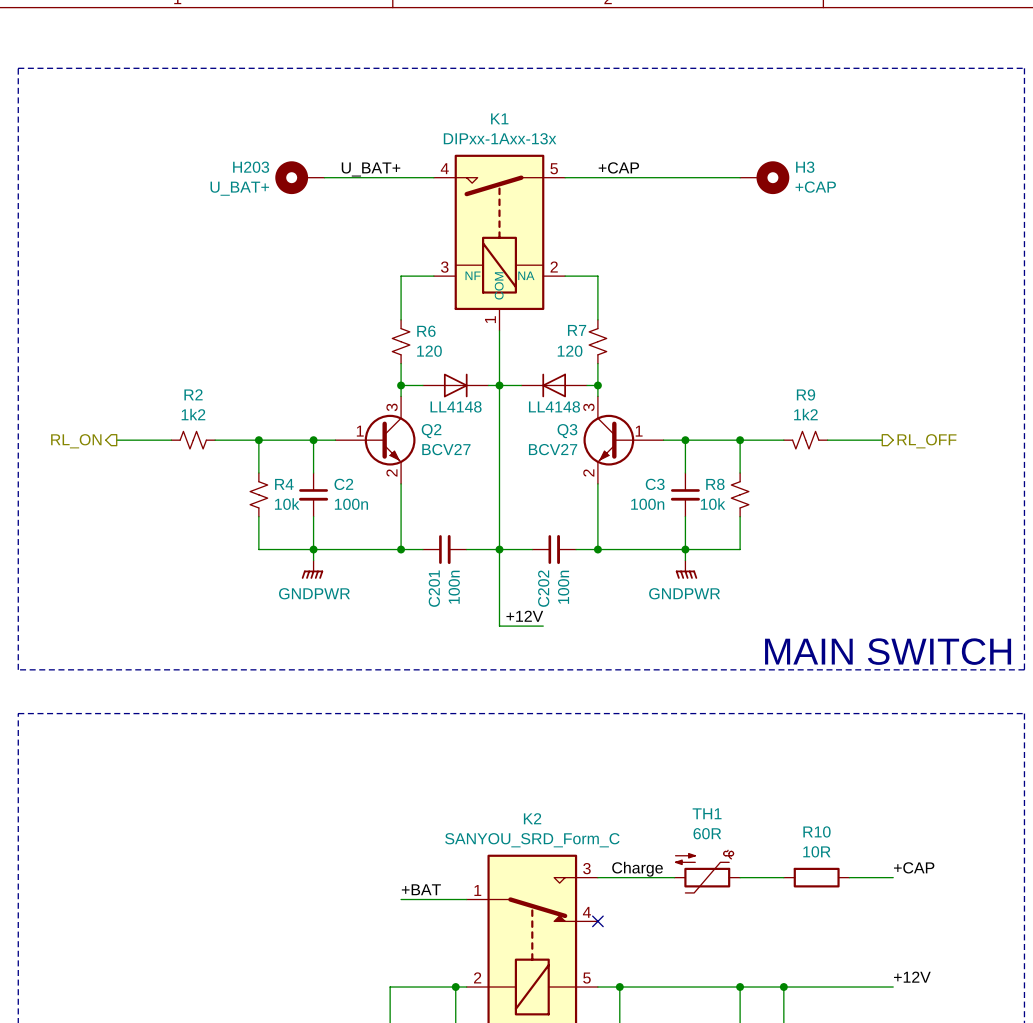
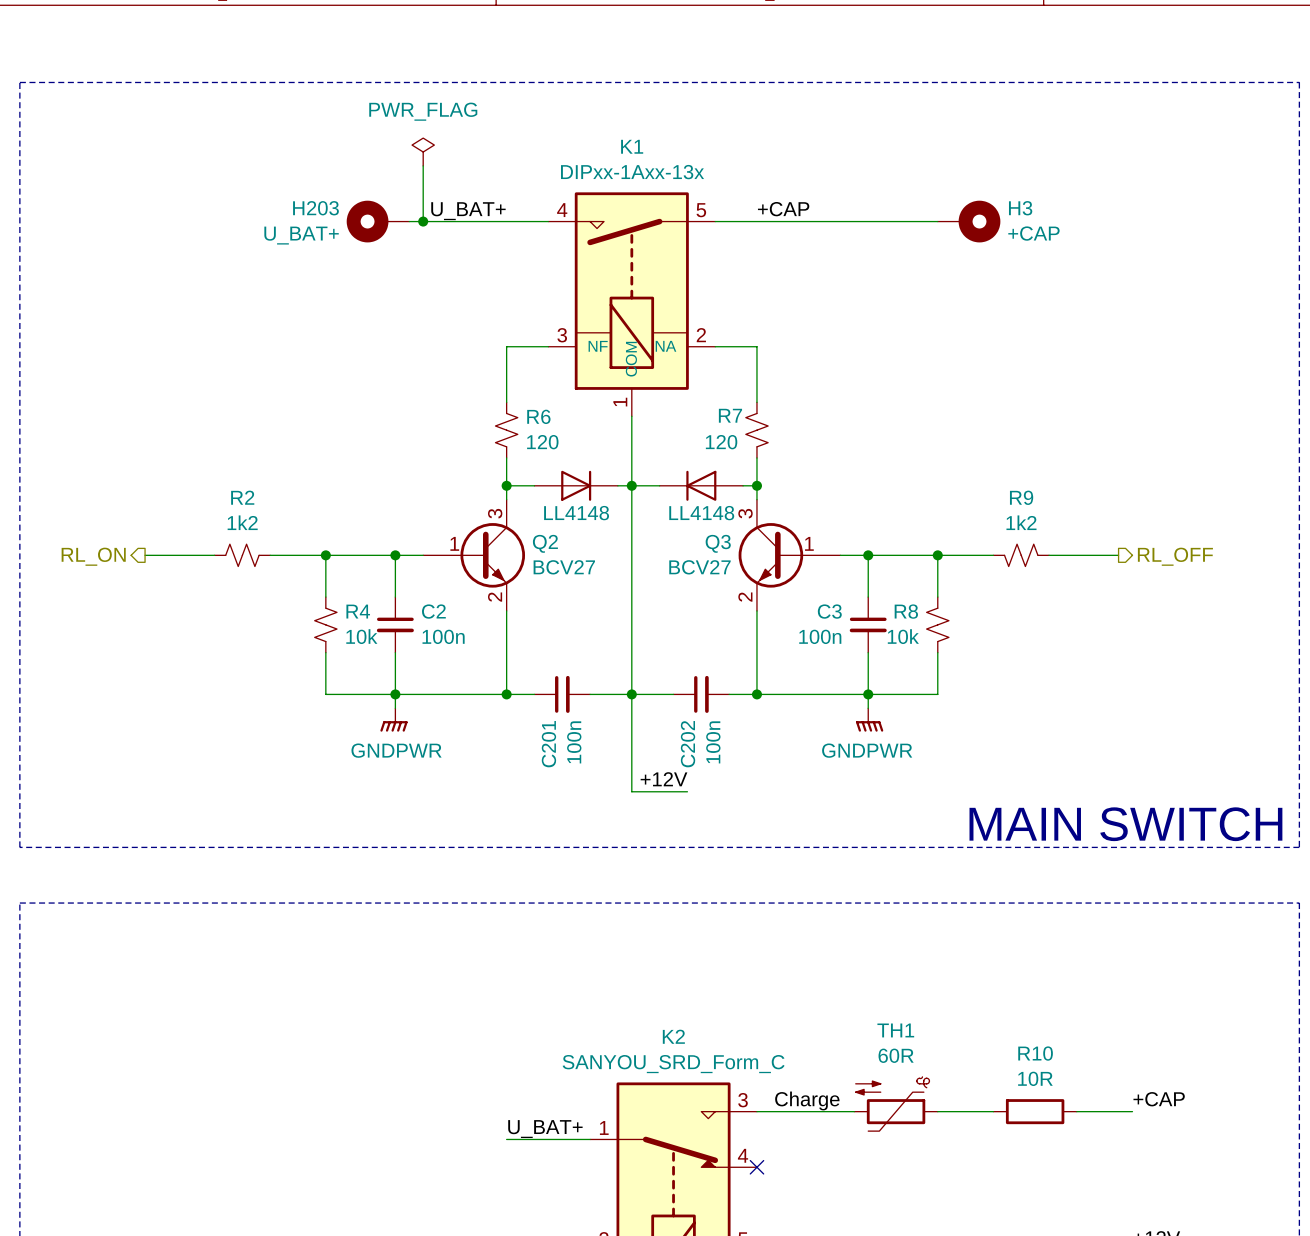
power symbol: none -> PWR_FLAG (423, 152)
wire: none -> (423, 165) (423, 221)
junction: none -> (423, 221)
label: +BAT (421, 889) -> U_BAT+ (545, 1129)

